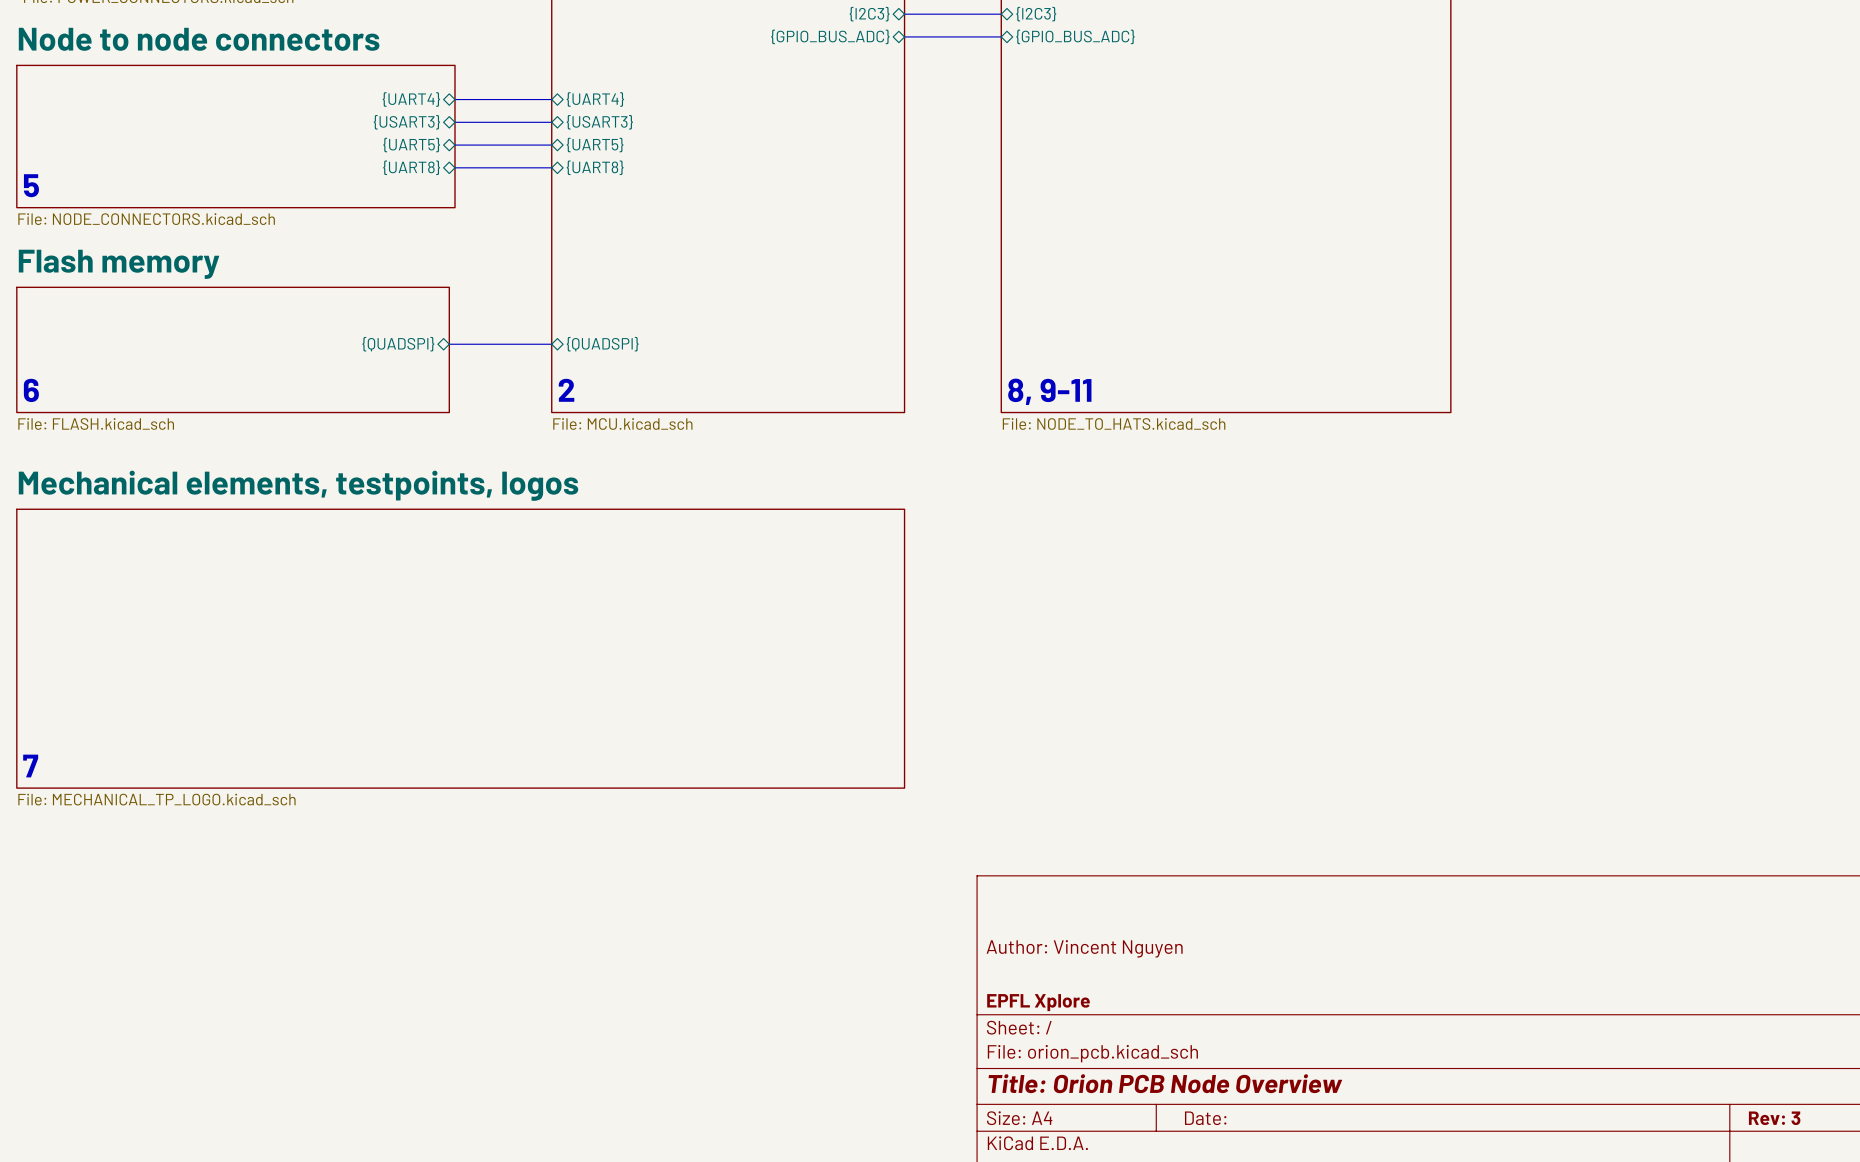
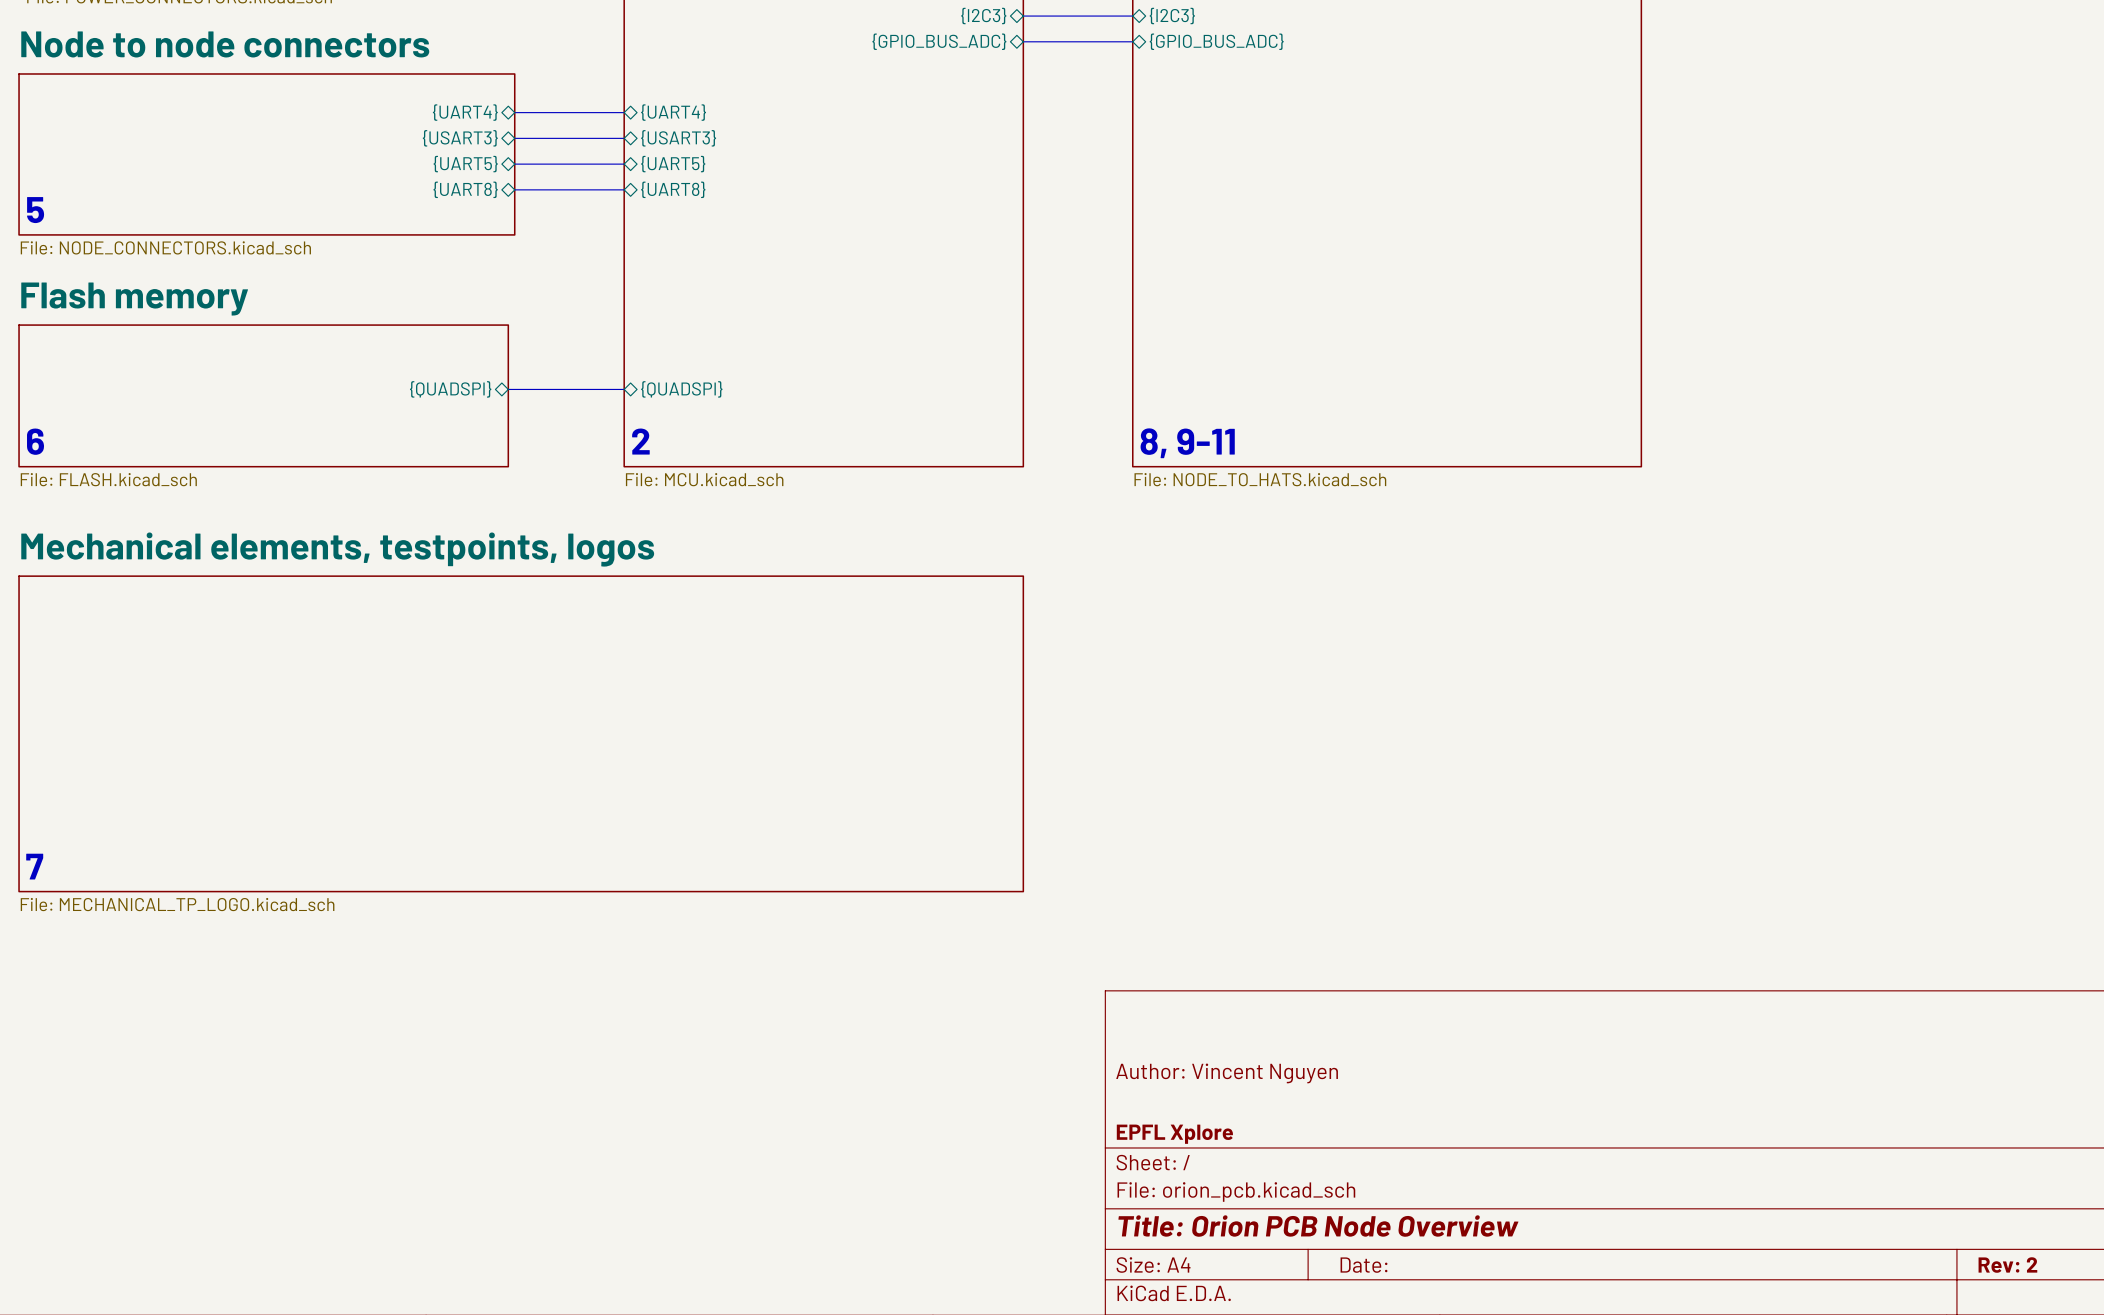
title block: Rev: 3 (1774, 1118) -> Rev: 2 (2007, 1265)

